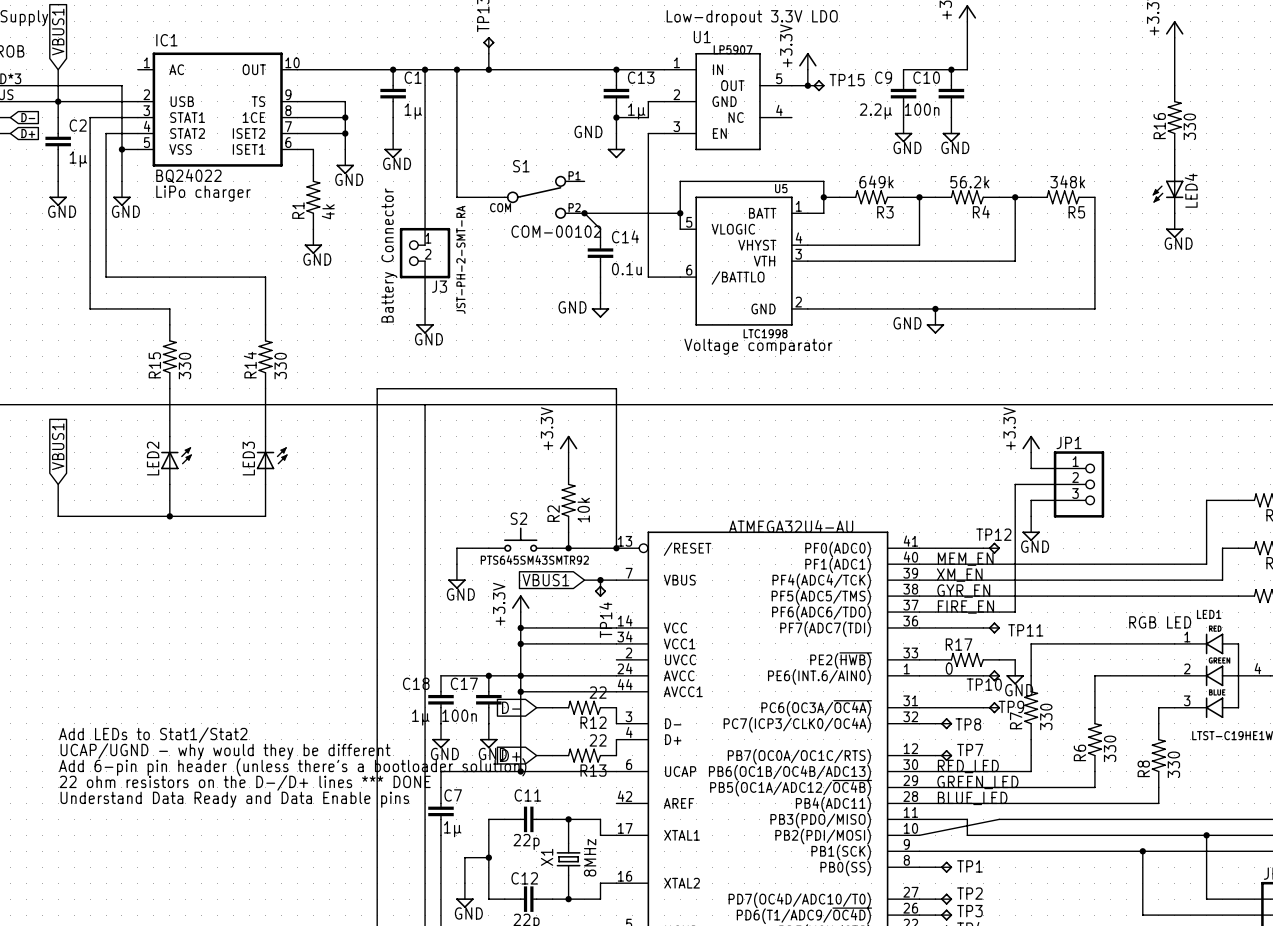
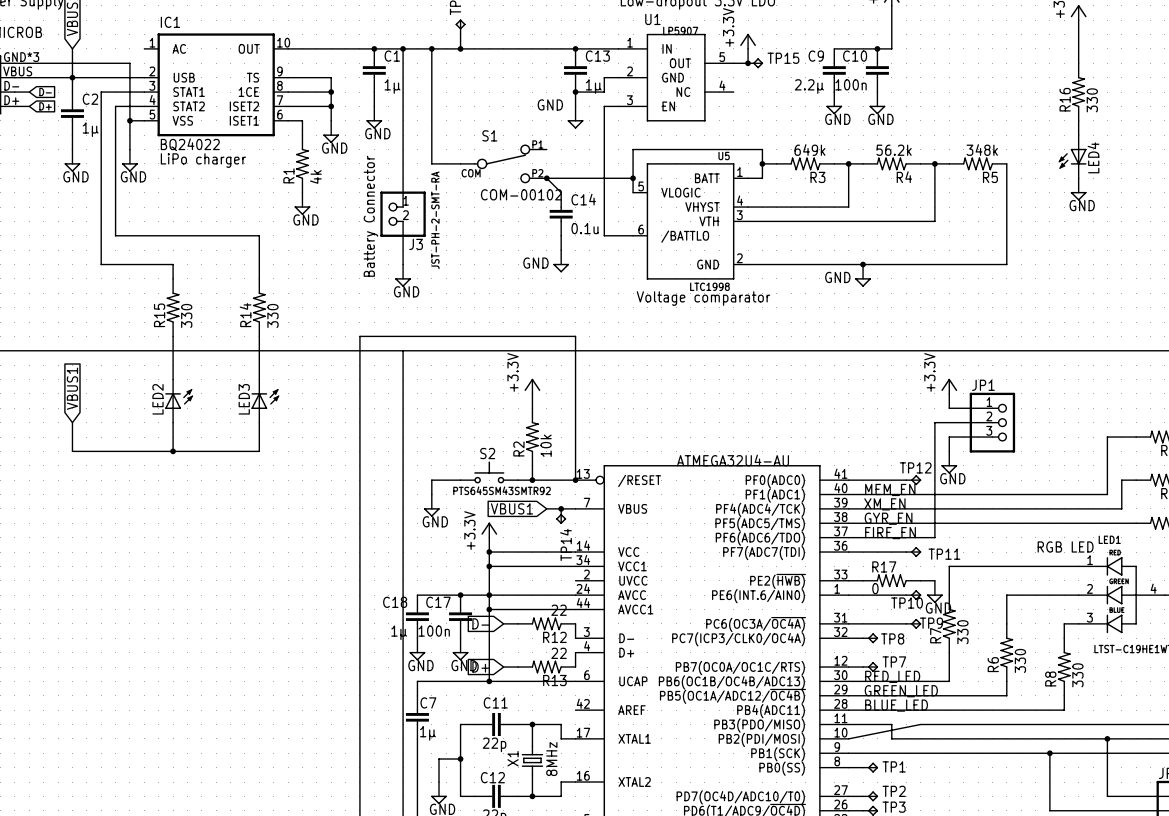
text: Add LEDs to Stat1/Stat2 (153, 735) -> none
text: UCAP/UGND - why would they be different (225, 751) -> none
text: Add 6-pin pin header (unless there's a bootloader solution) (292, 767) -> none
text: 22 ohm resistors on the D-/D+ lines *** DONE (245, 782) -> none
text: Understand Data Ready and Data Enable pins (234, 799) -> none

